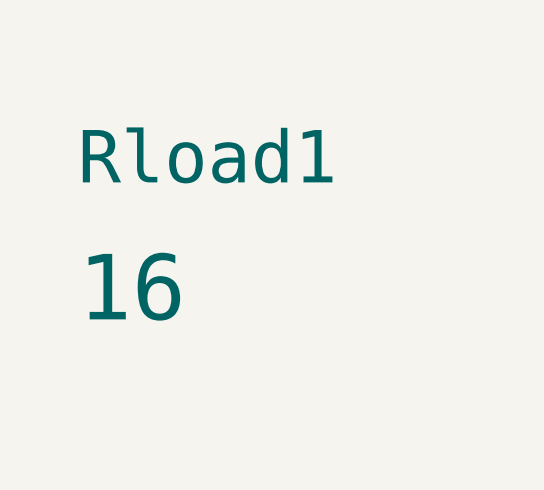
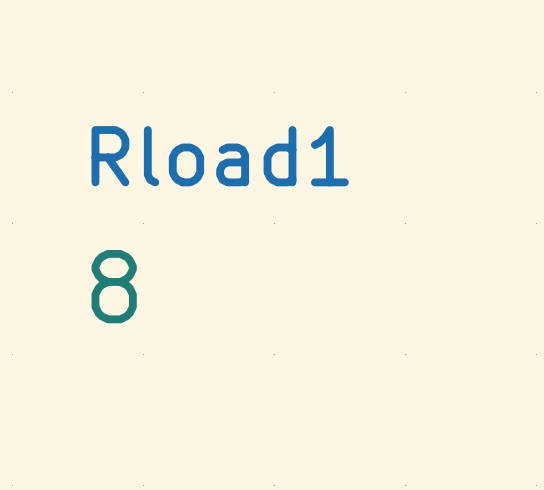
Rload1 value: 16 (134, 286) -> 8 (114, 286)

